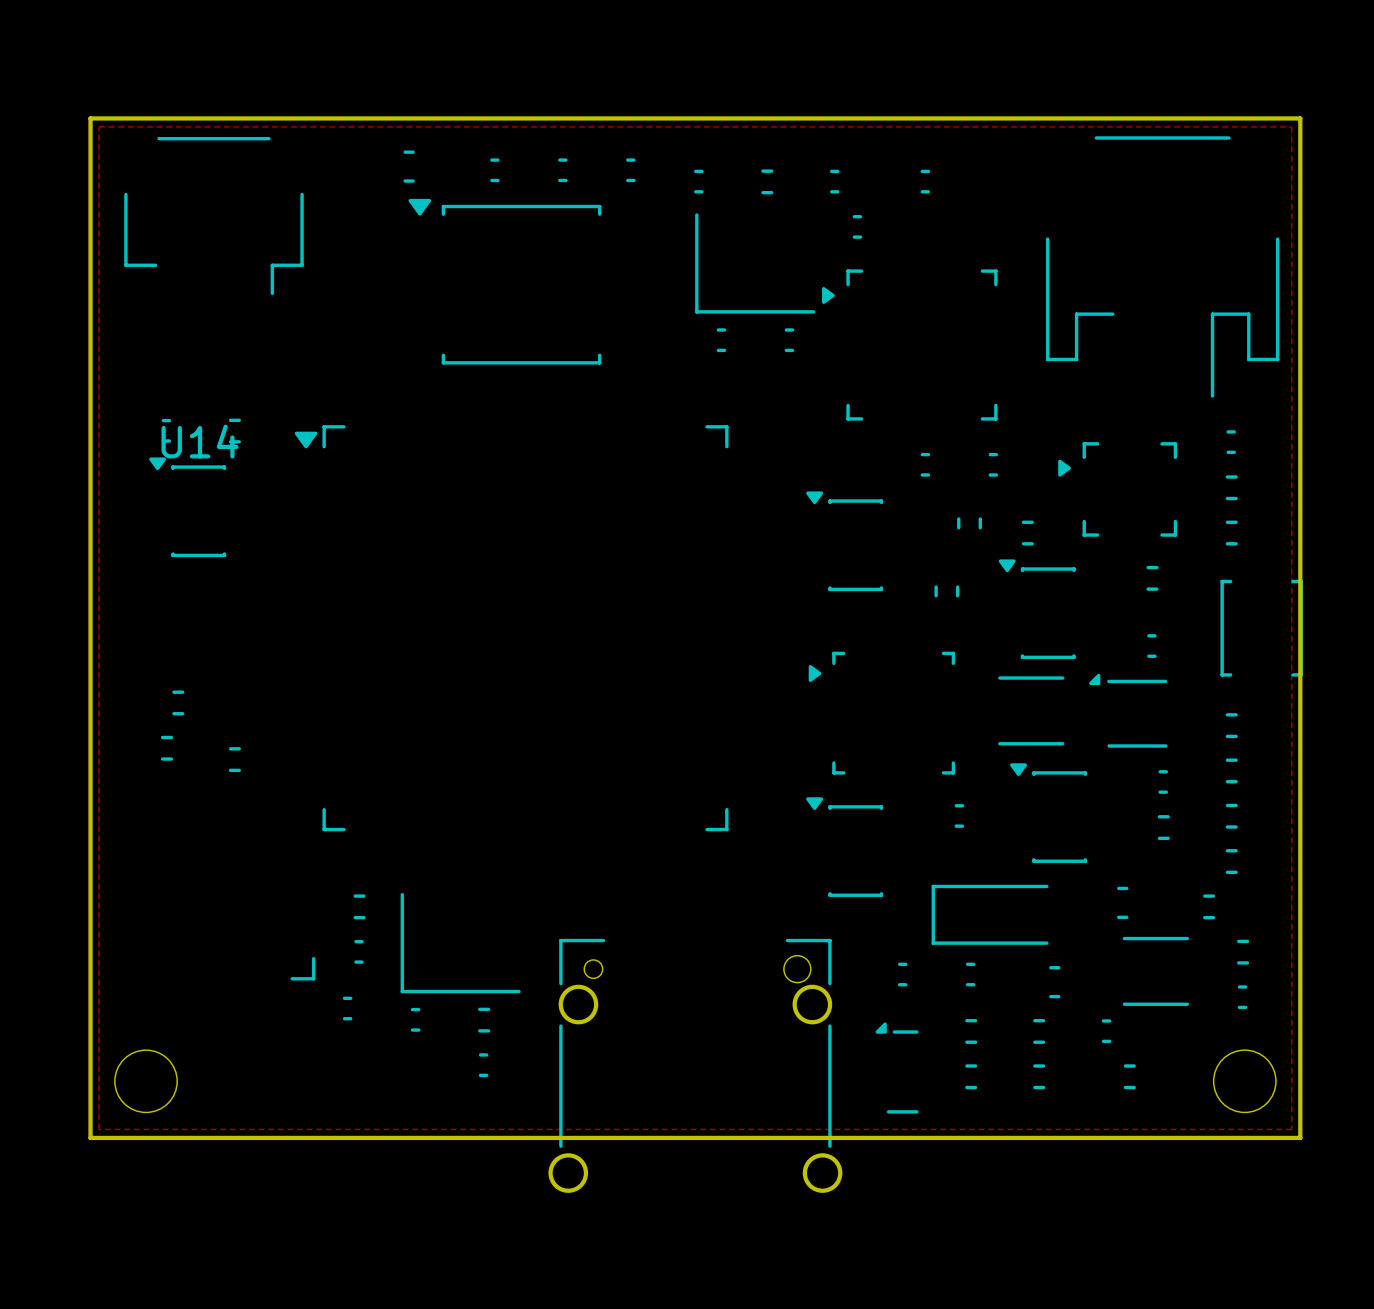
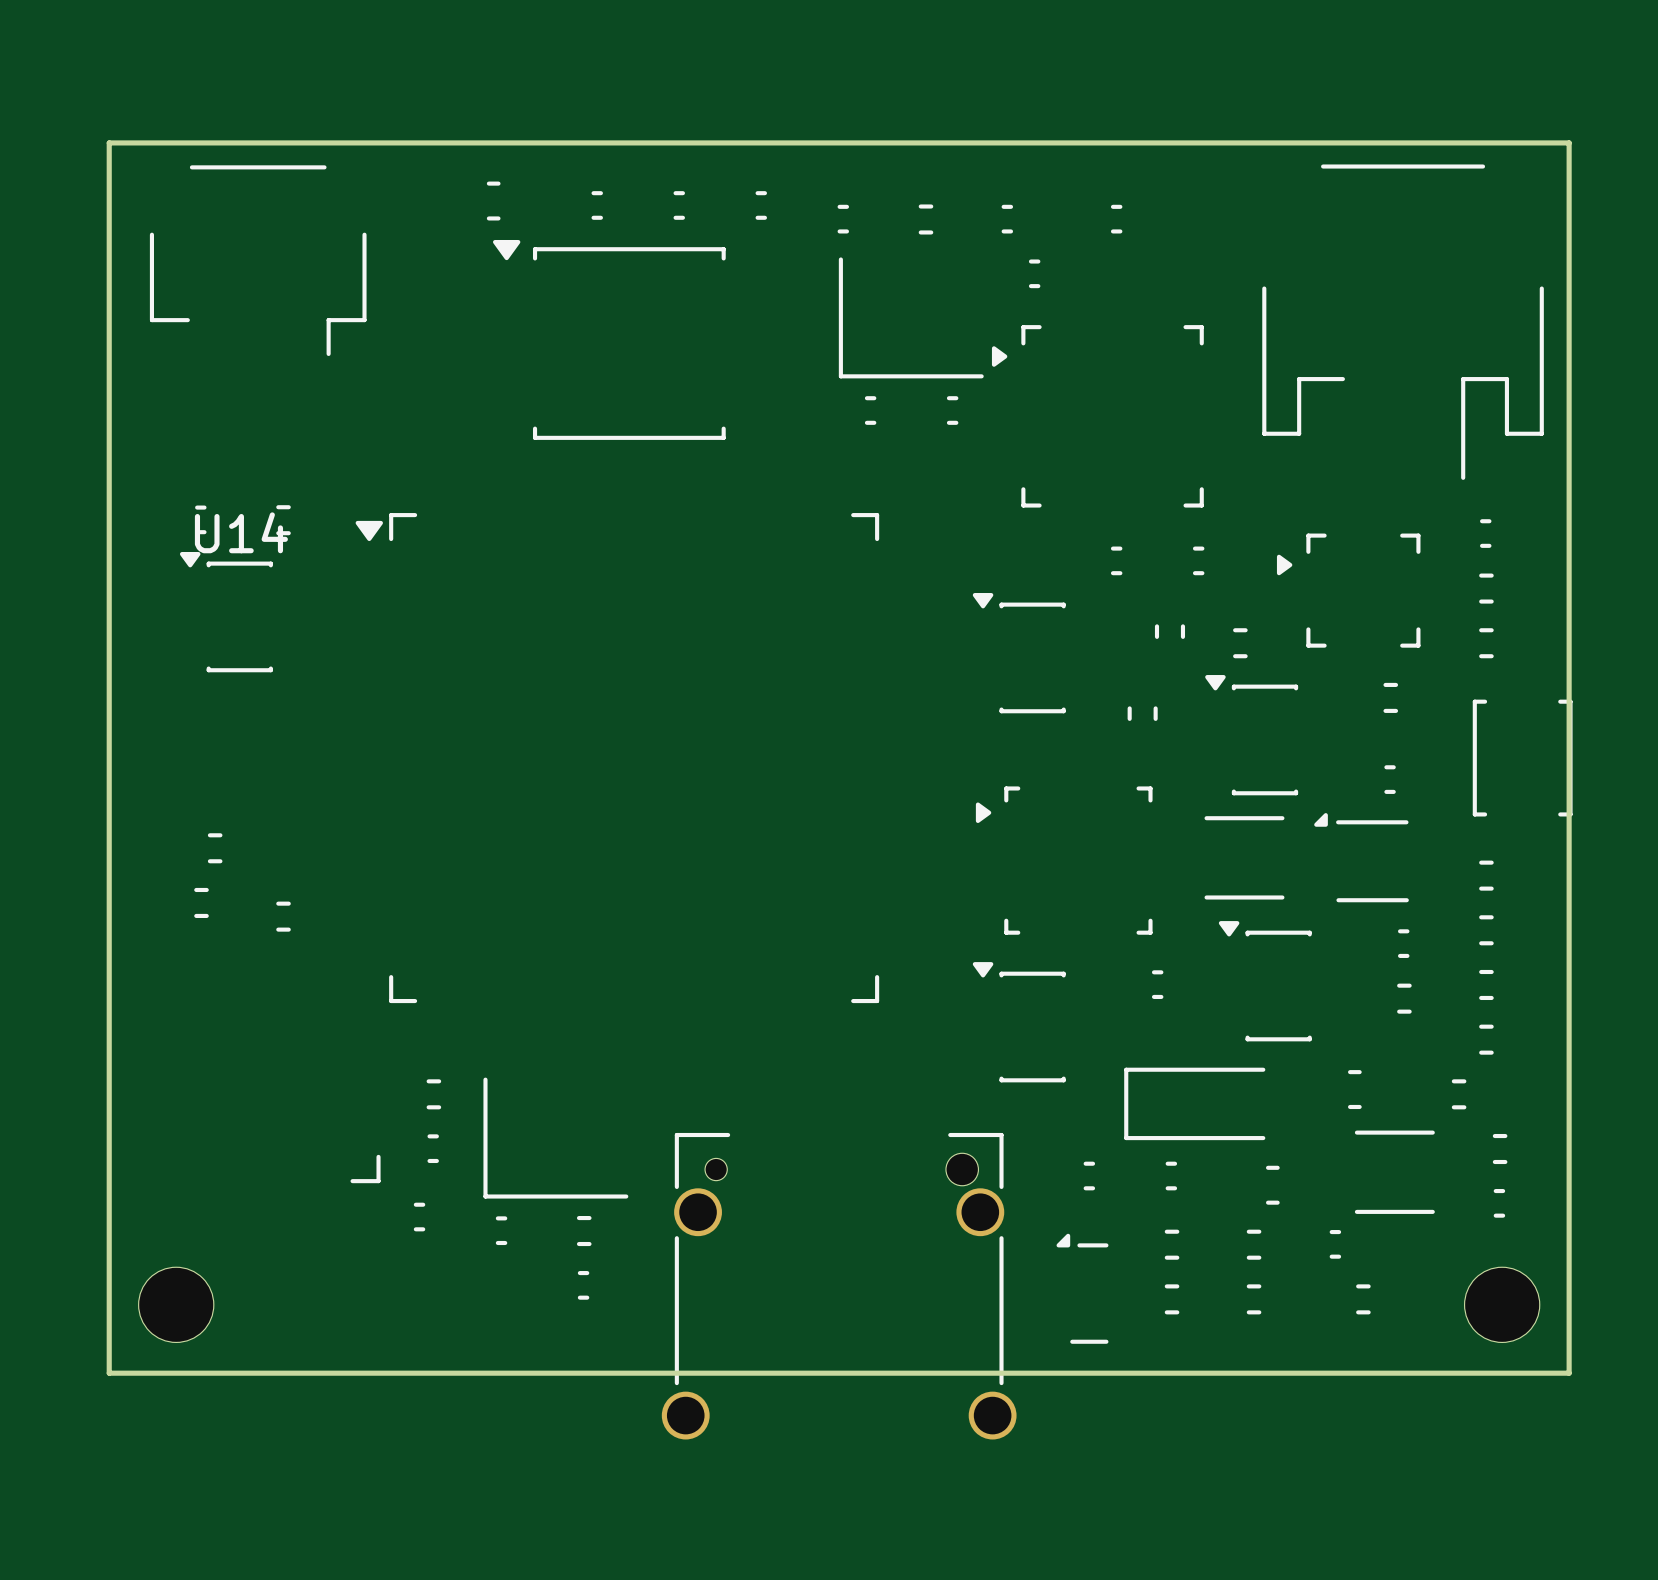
zone outline: (99, 126) (1291, 126) (1291, 1129) (99, 1129) (99, 126) -> none

